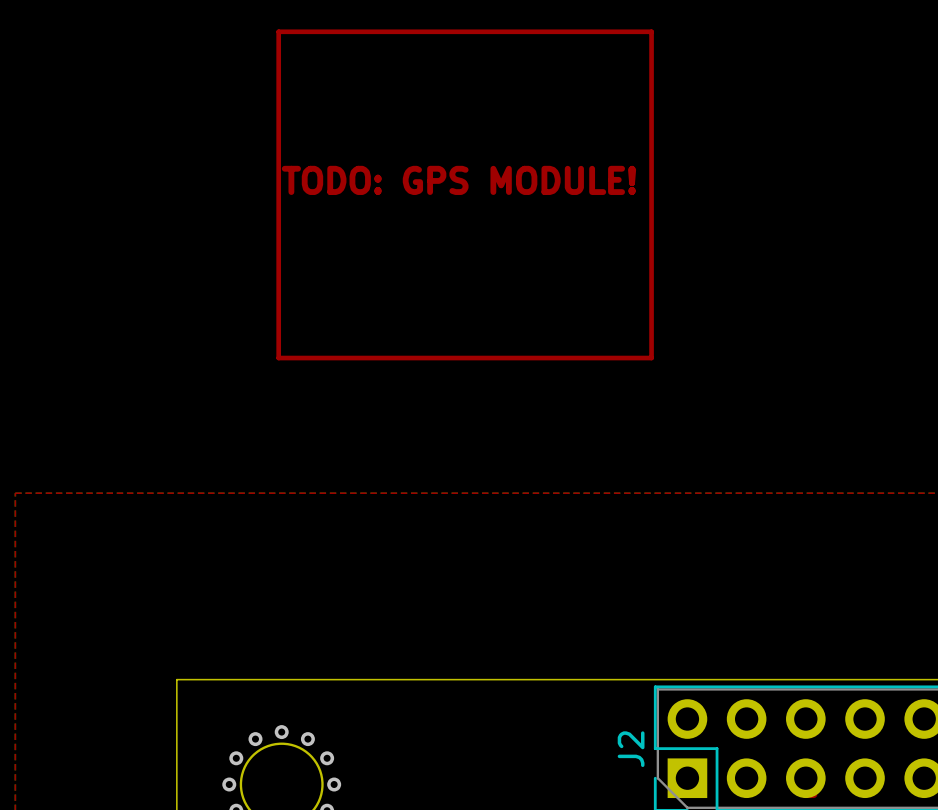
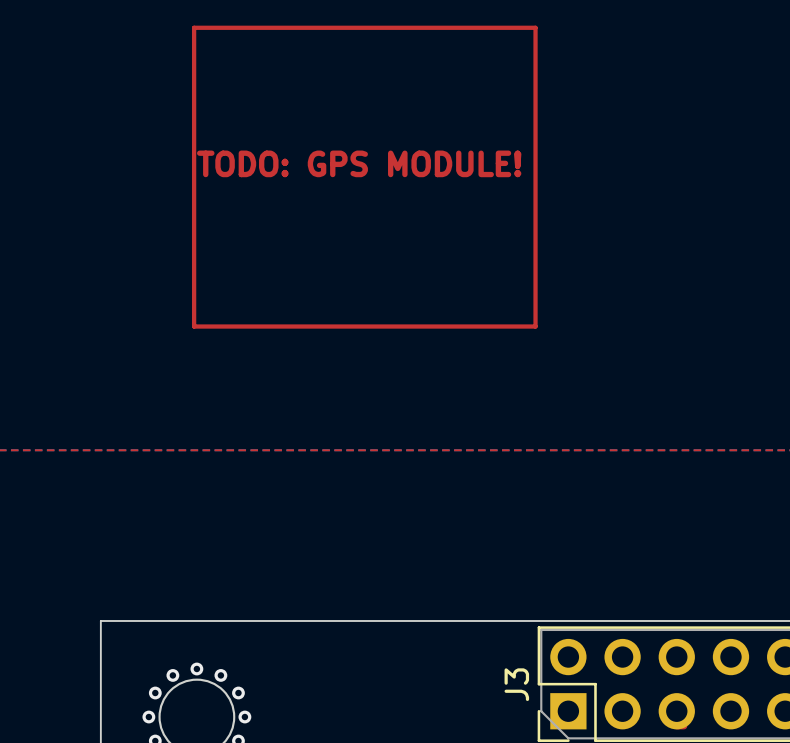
J2 name: J2 (631, 749) -> J3 (516, 684)

